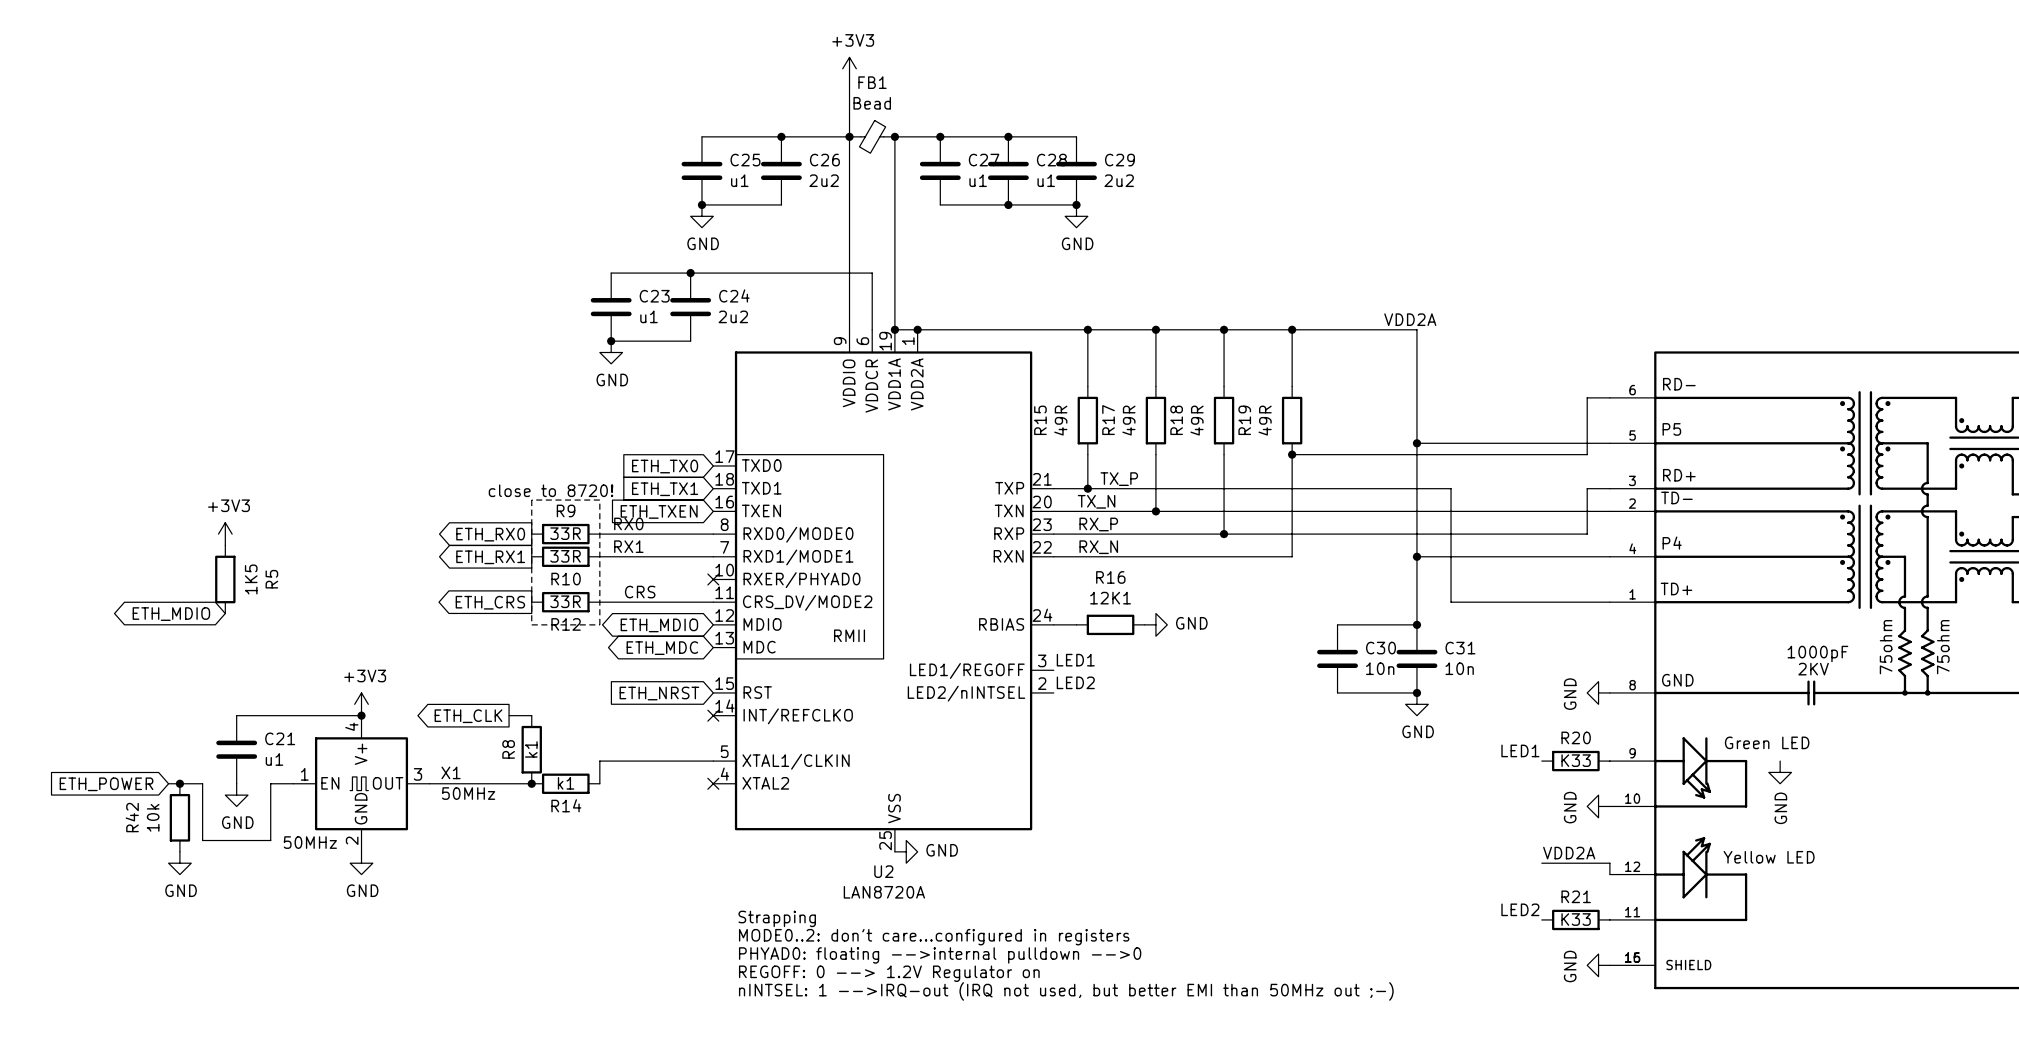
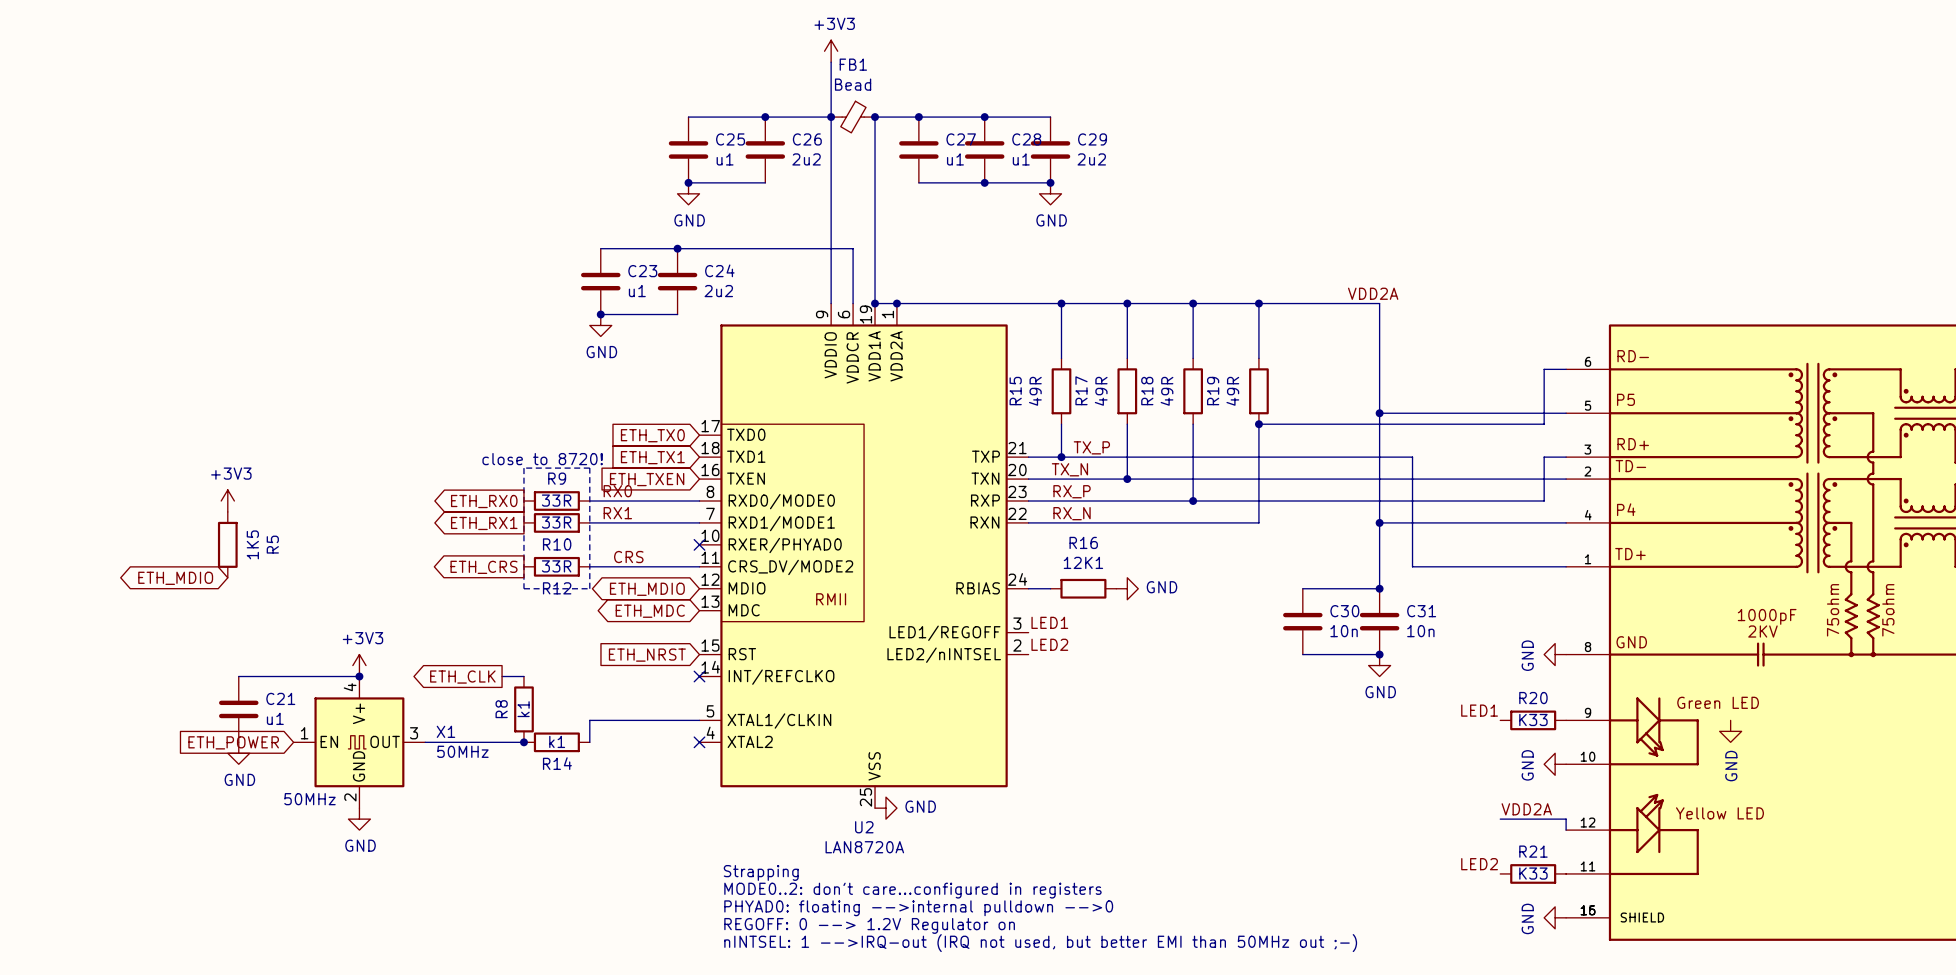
wire: (168, 783) (202, 783) (202, 840) (270, 840) (270, 783) (293, 783) -> none
junction: (179, 783) -> none
global label position: ETH_POWER (106, 784) -> ETH_POWER (233, 742)
R42: 10k (179, 817) -> none
power symbol: GND (179, 863) -> none

